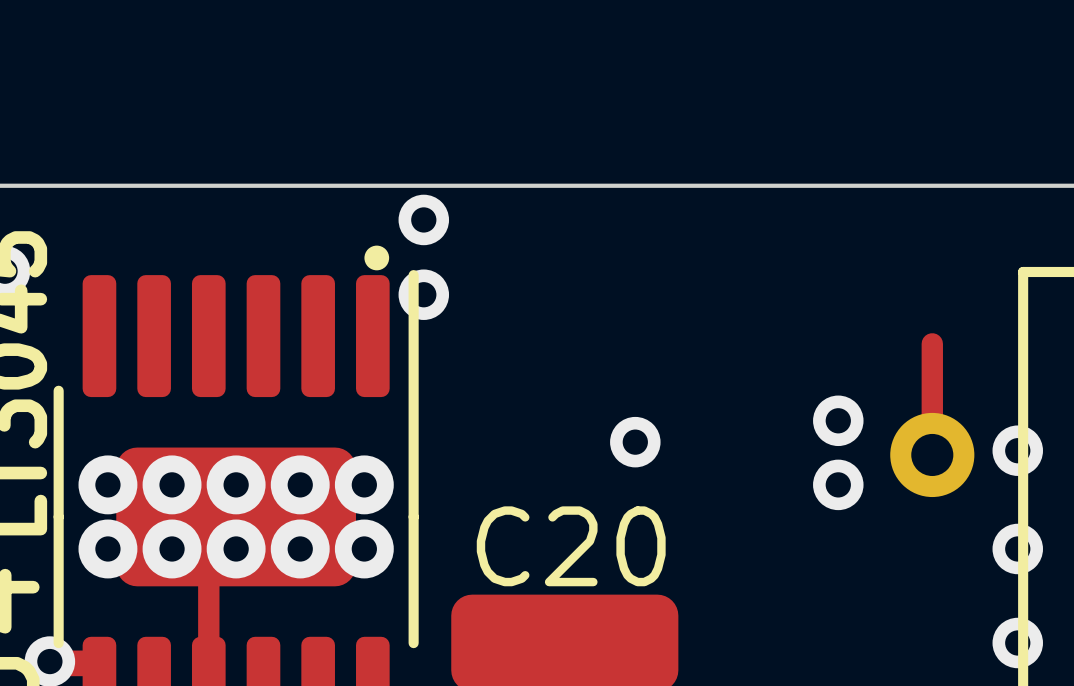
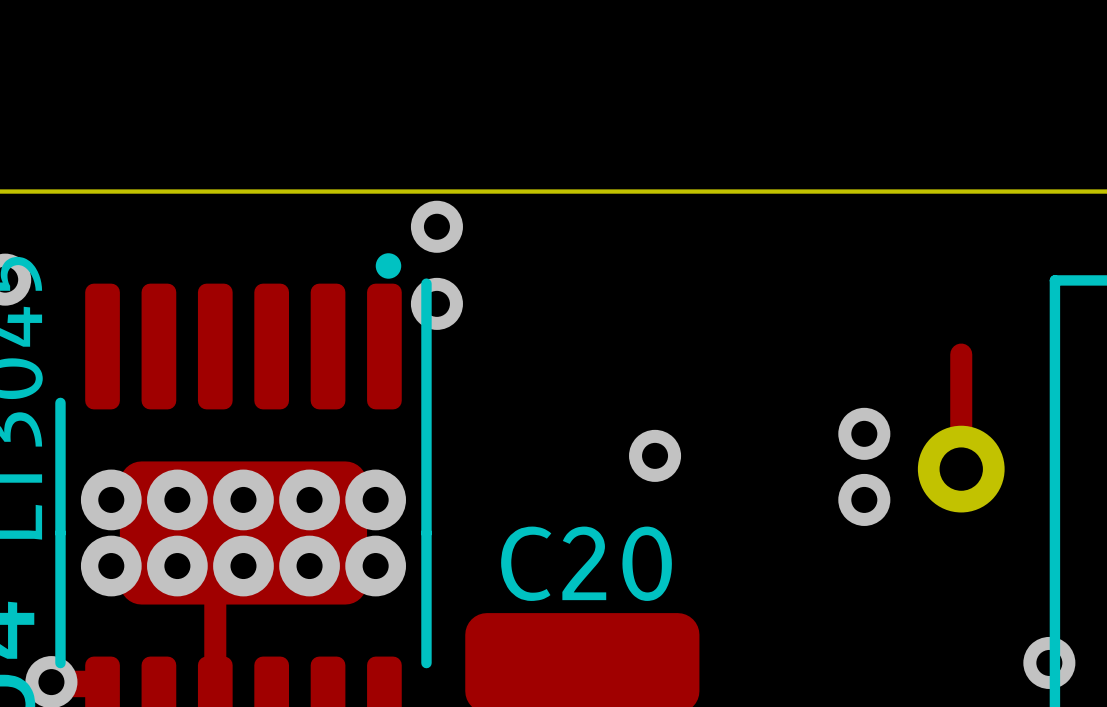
via: (1017, 450) -> none
via: (1017, 548) -> none

